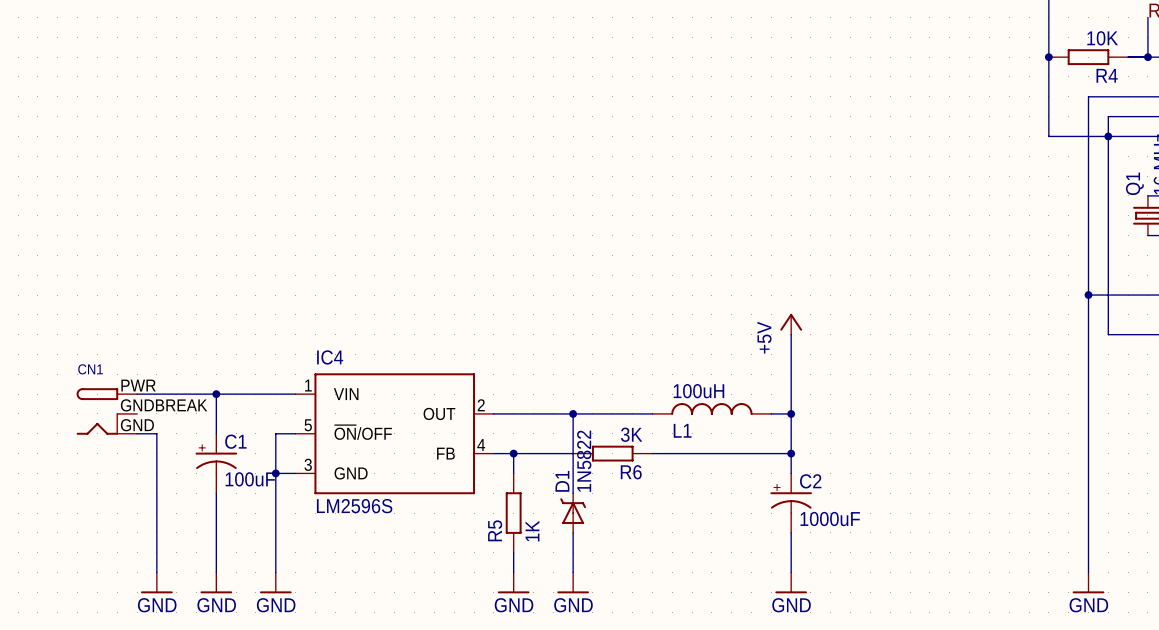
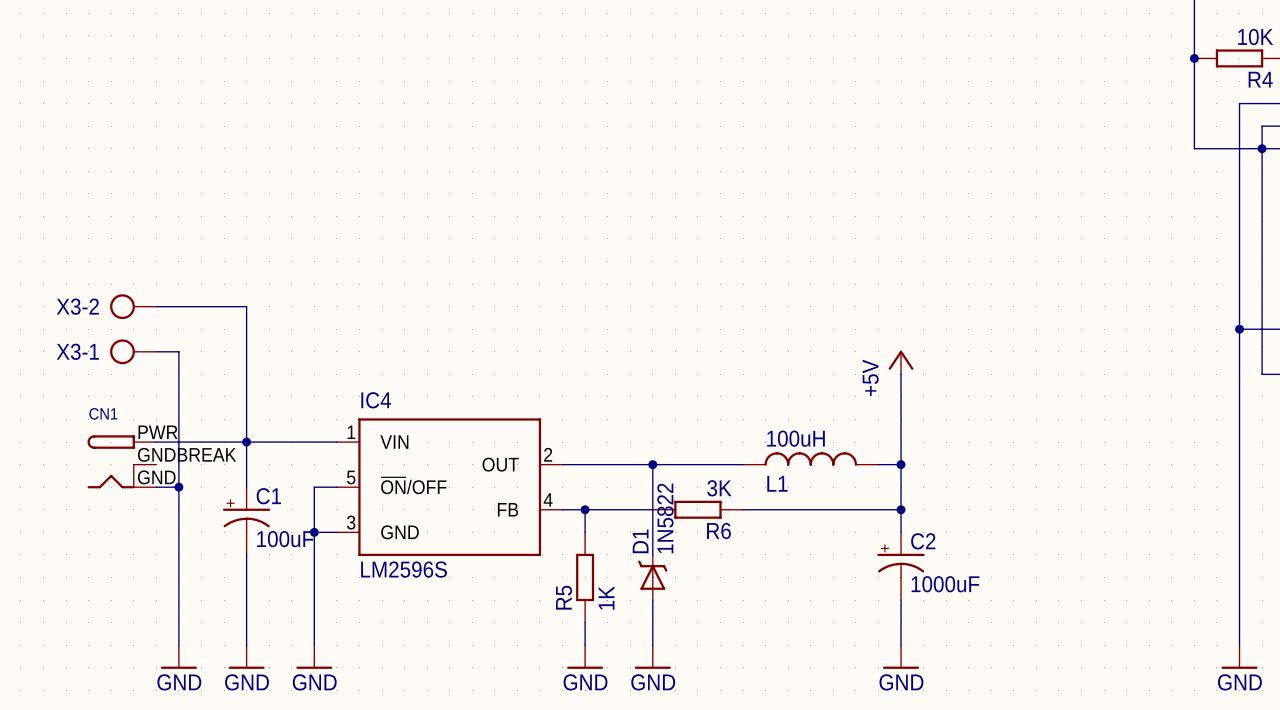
X3-2: none -> (133, 306)
wire: none -> (156, 306) (246, 306) (246, 442)
X3-1: none -> (133, 351)
wire: none -> (156, 351) (178, 351) (178, 487)
junction: none -> (178, 487)

